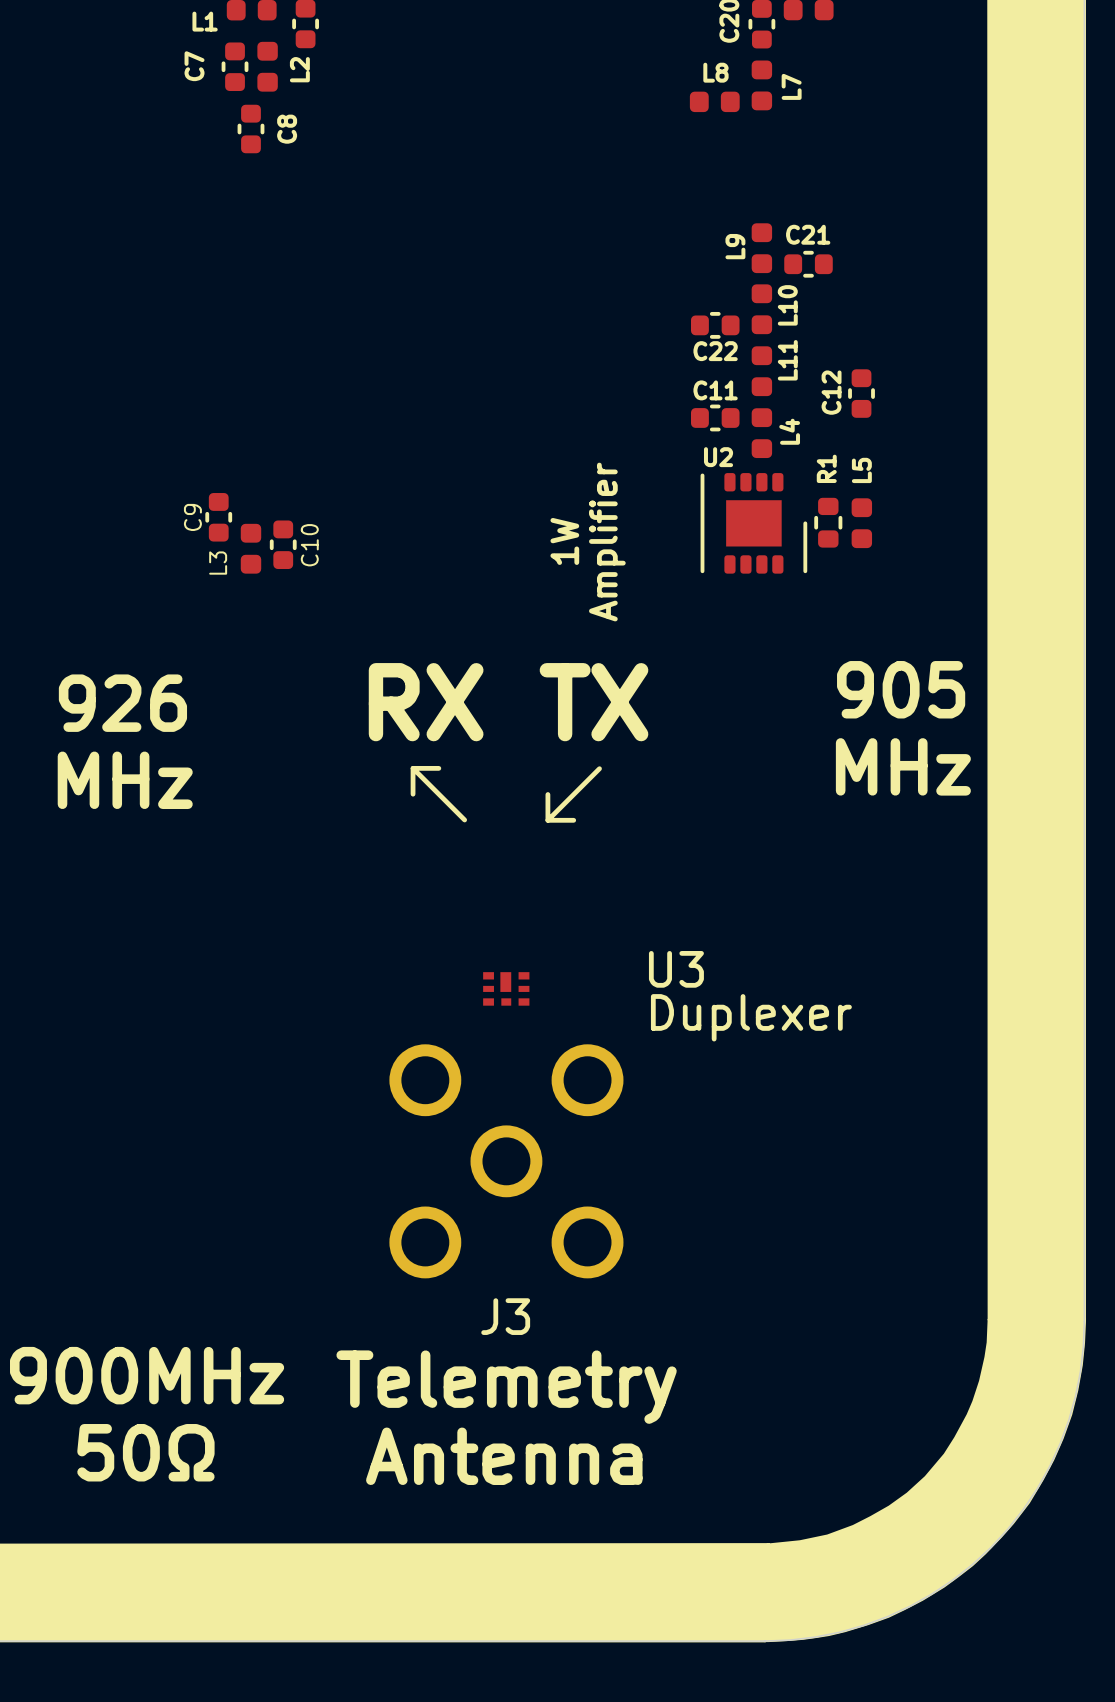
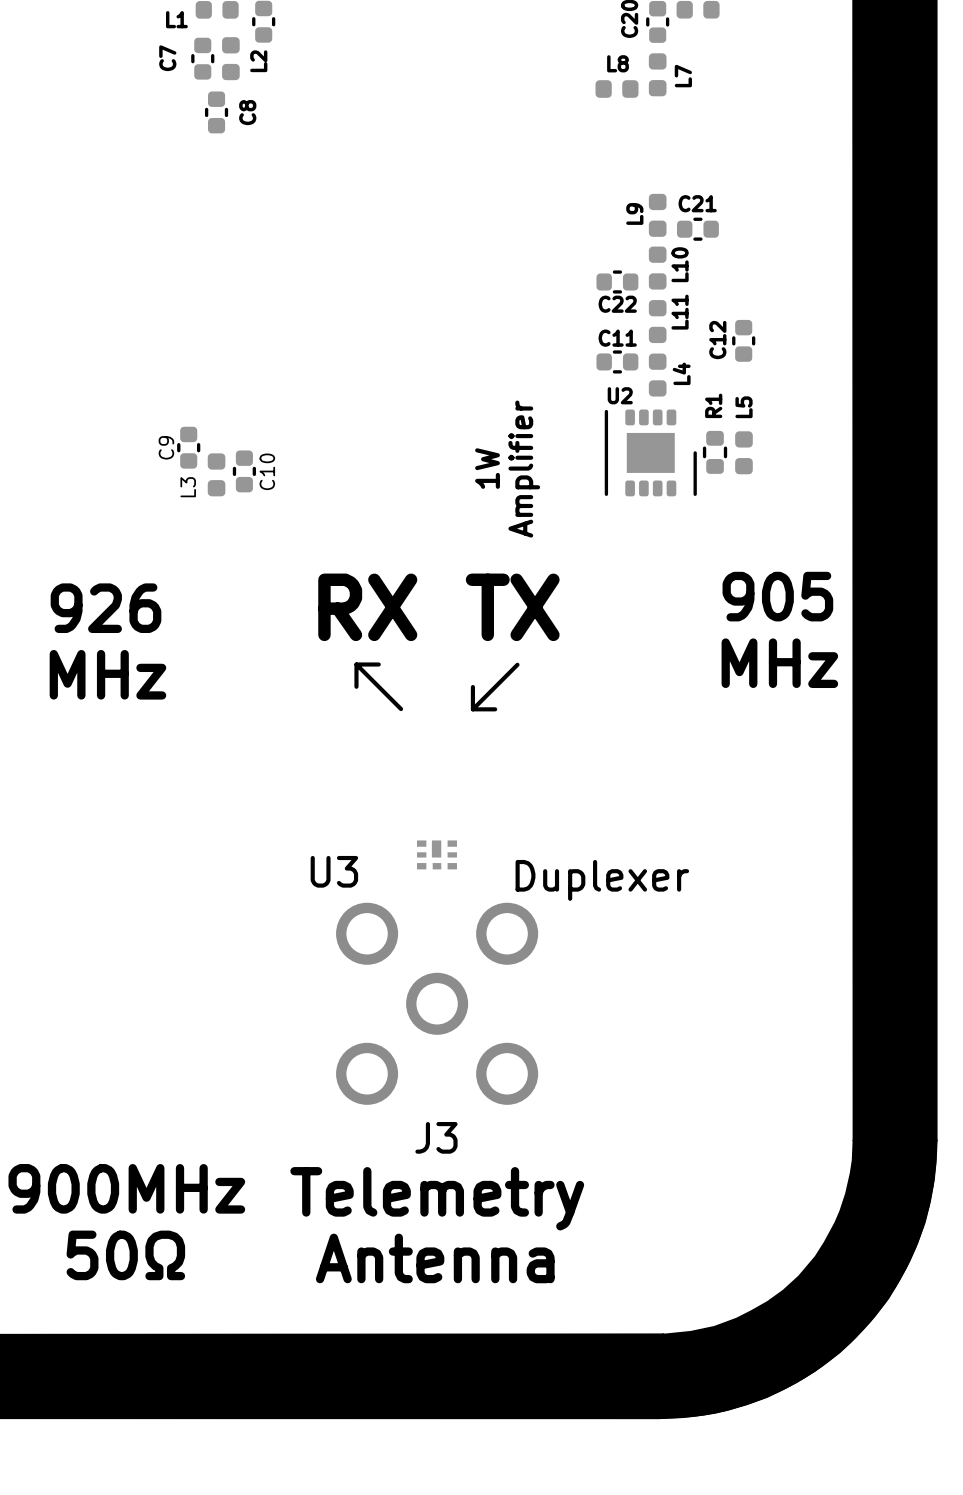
U3 name position: U3 (676, 969) -> U3 (334, 871)
text position: Duplexer (751, 1017) -> Duplexer (602, 880)

